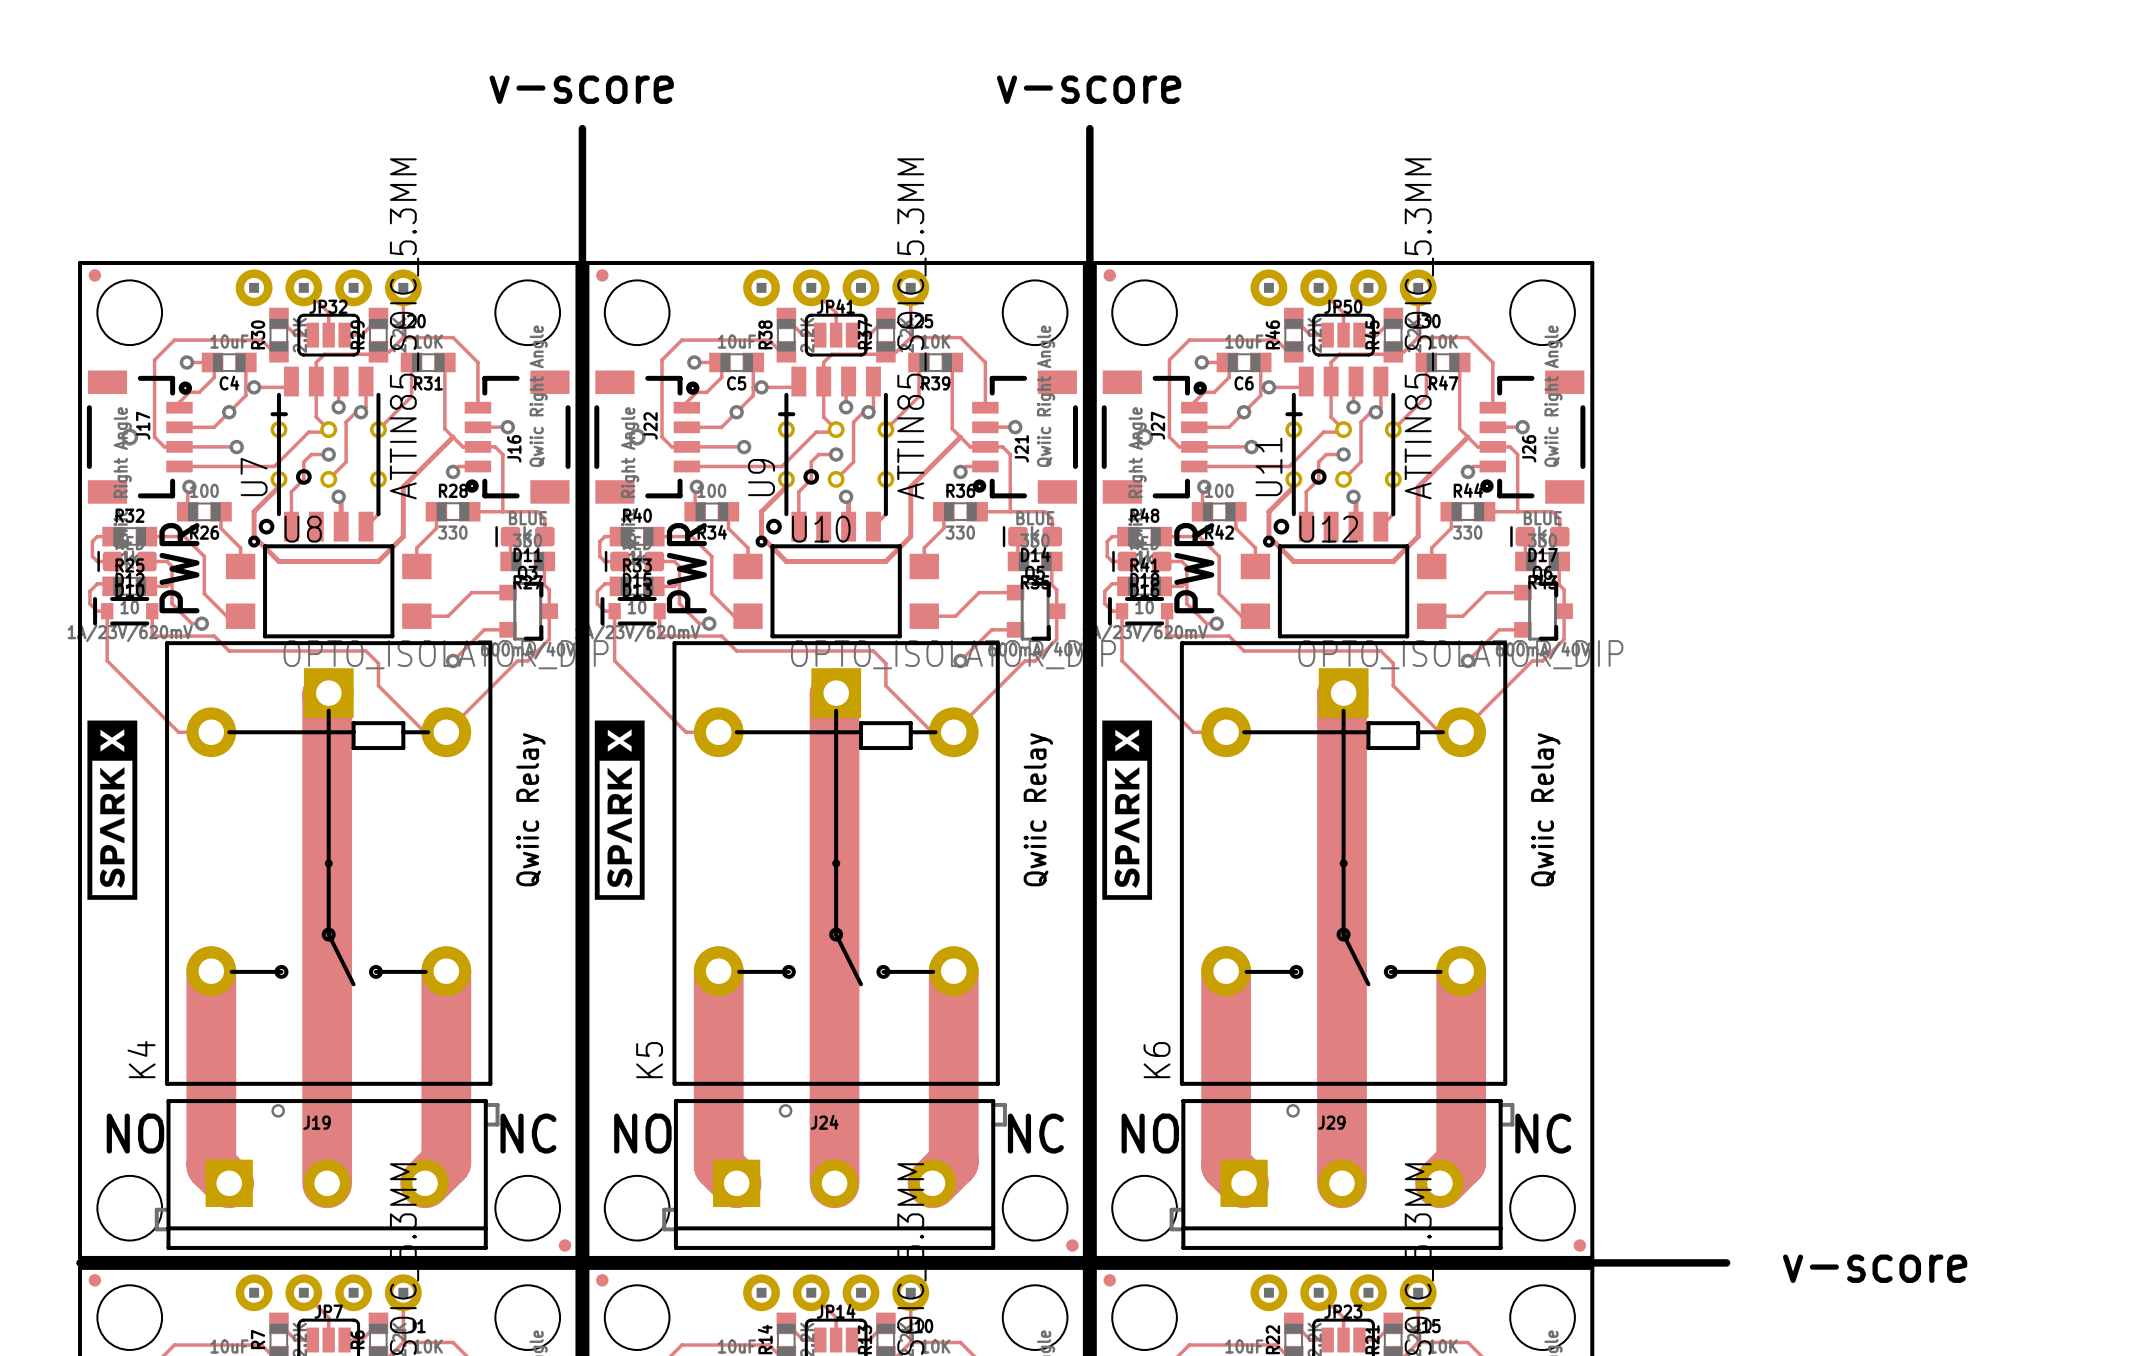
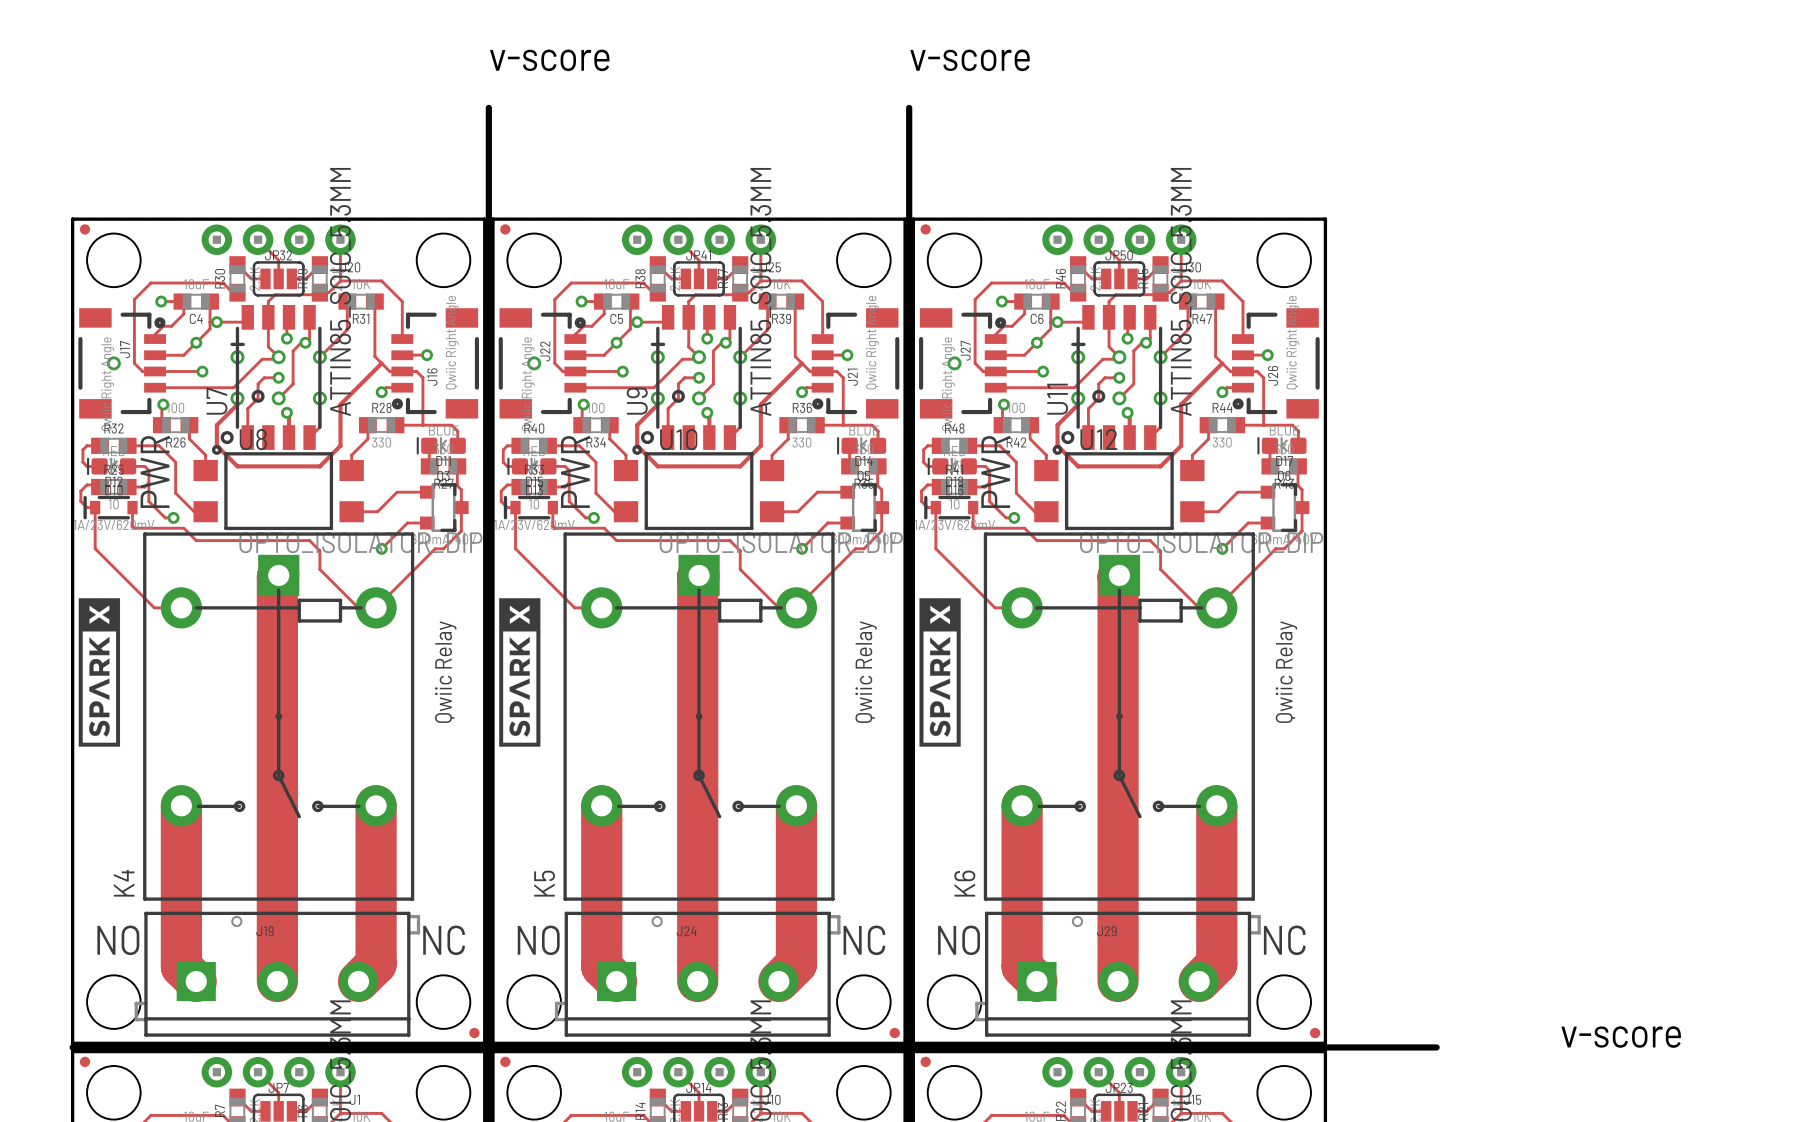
text position: v-score (581, 89) -> v-score (549, 60)
text position: v-score (1089, 89) -> v-score (970, 60)
text position: v-score (1875, 1268) -> v-score (1621, 1037)

